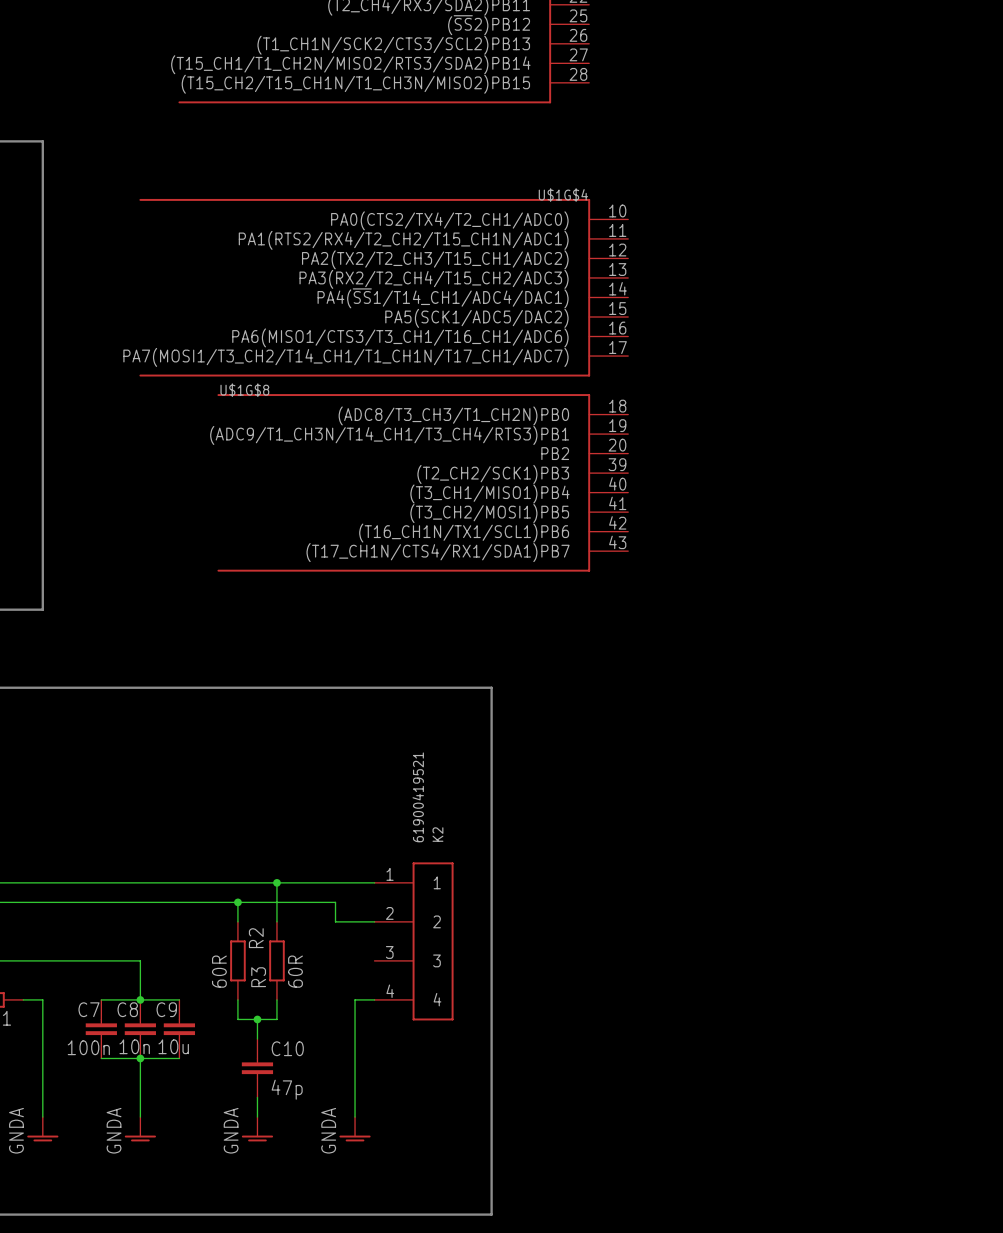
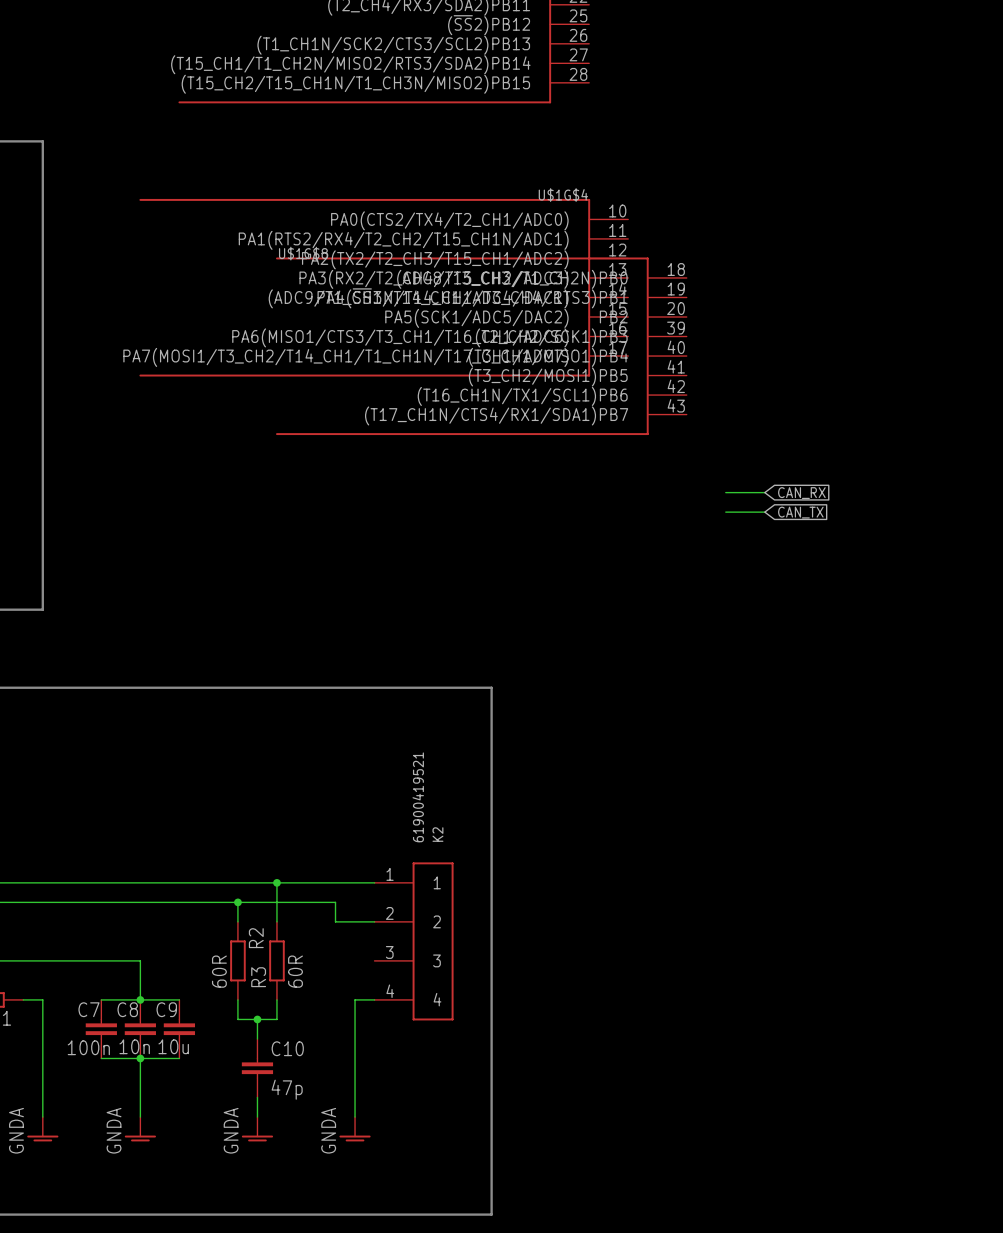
U$1G$8 position: (422, 482) -> (481, 346)
wire: none -> (725, 492) (764, 492)
global label: none -> CAN_RX (801, 493)
wire: none -> (725, 512) (764, 512)
global label: none -> CAN_TX (800, 512)

